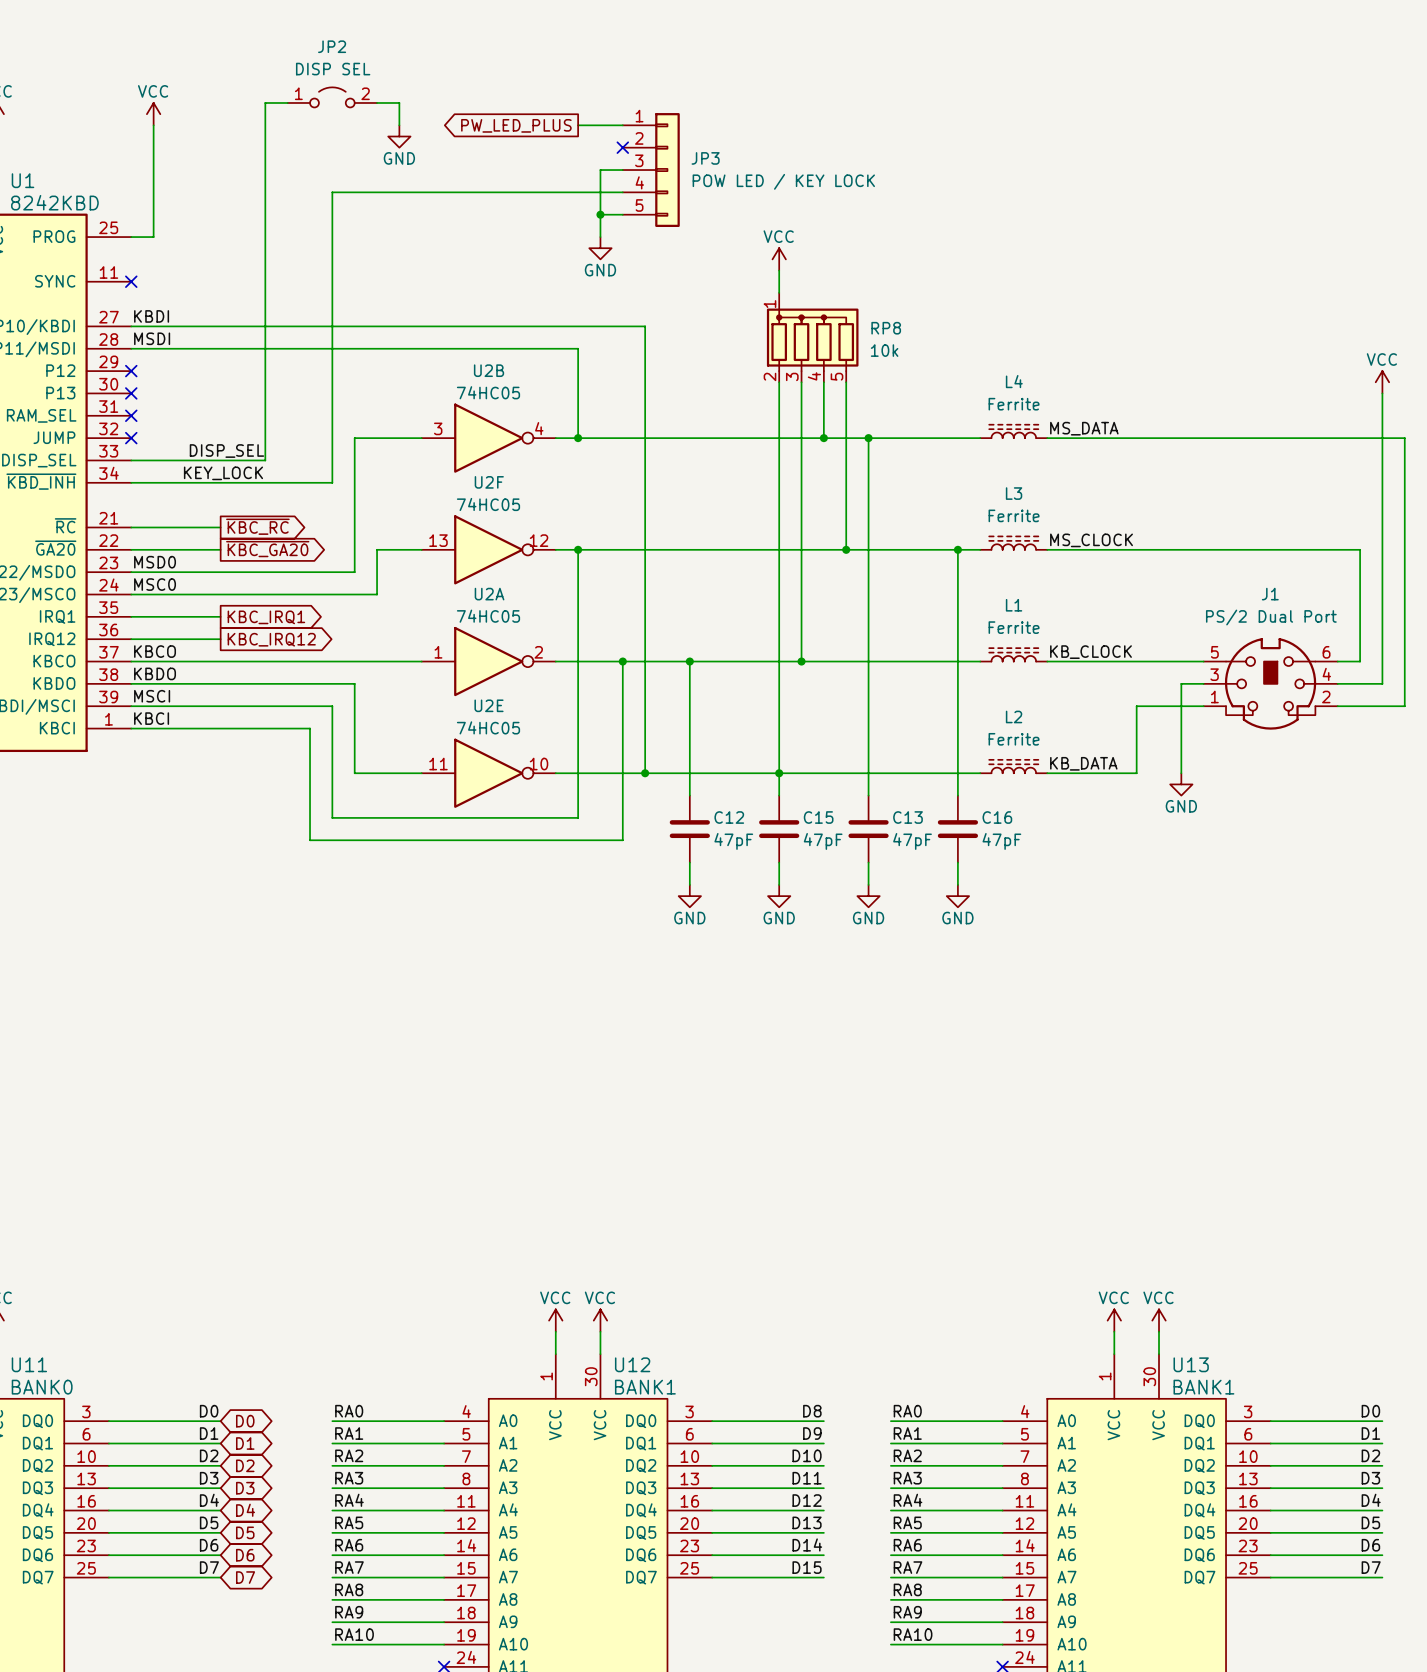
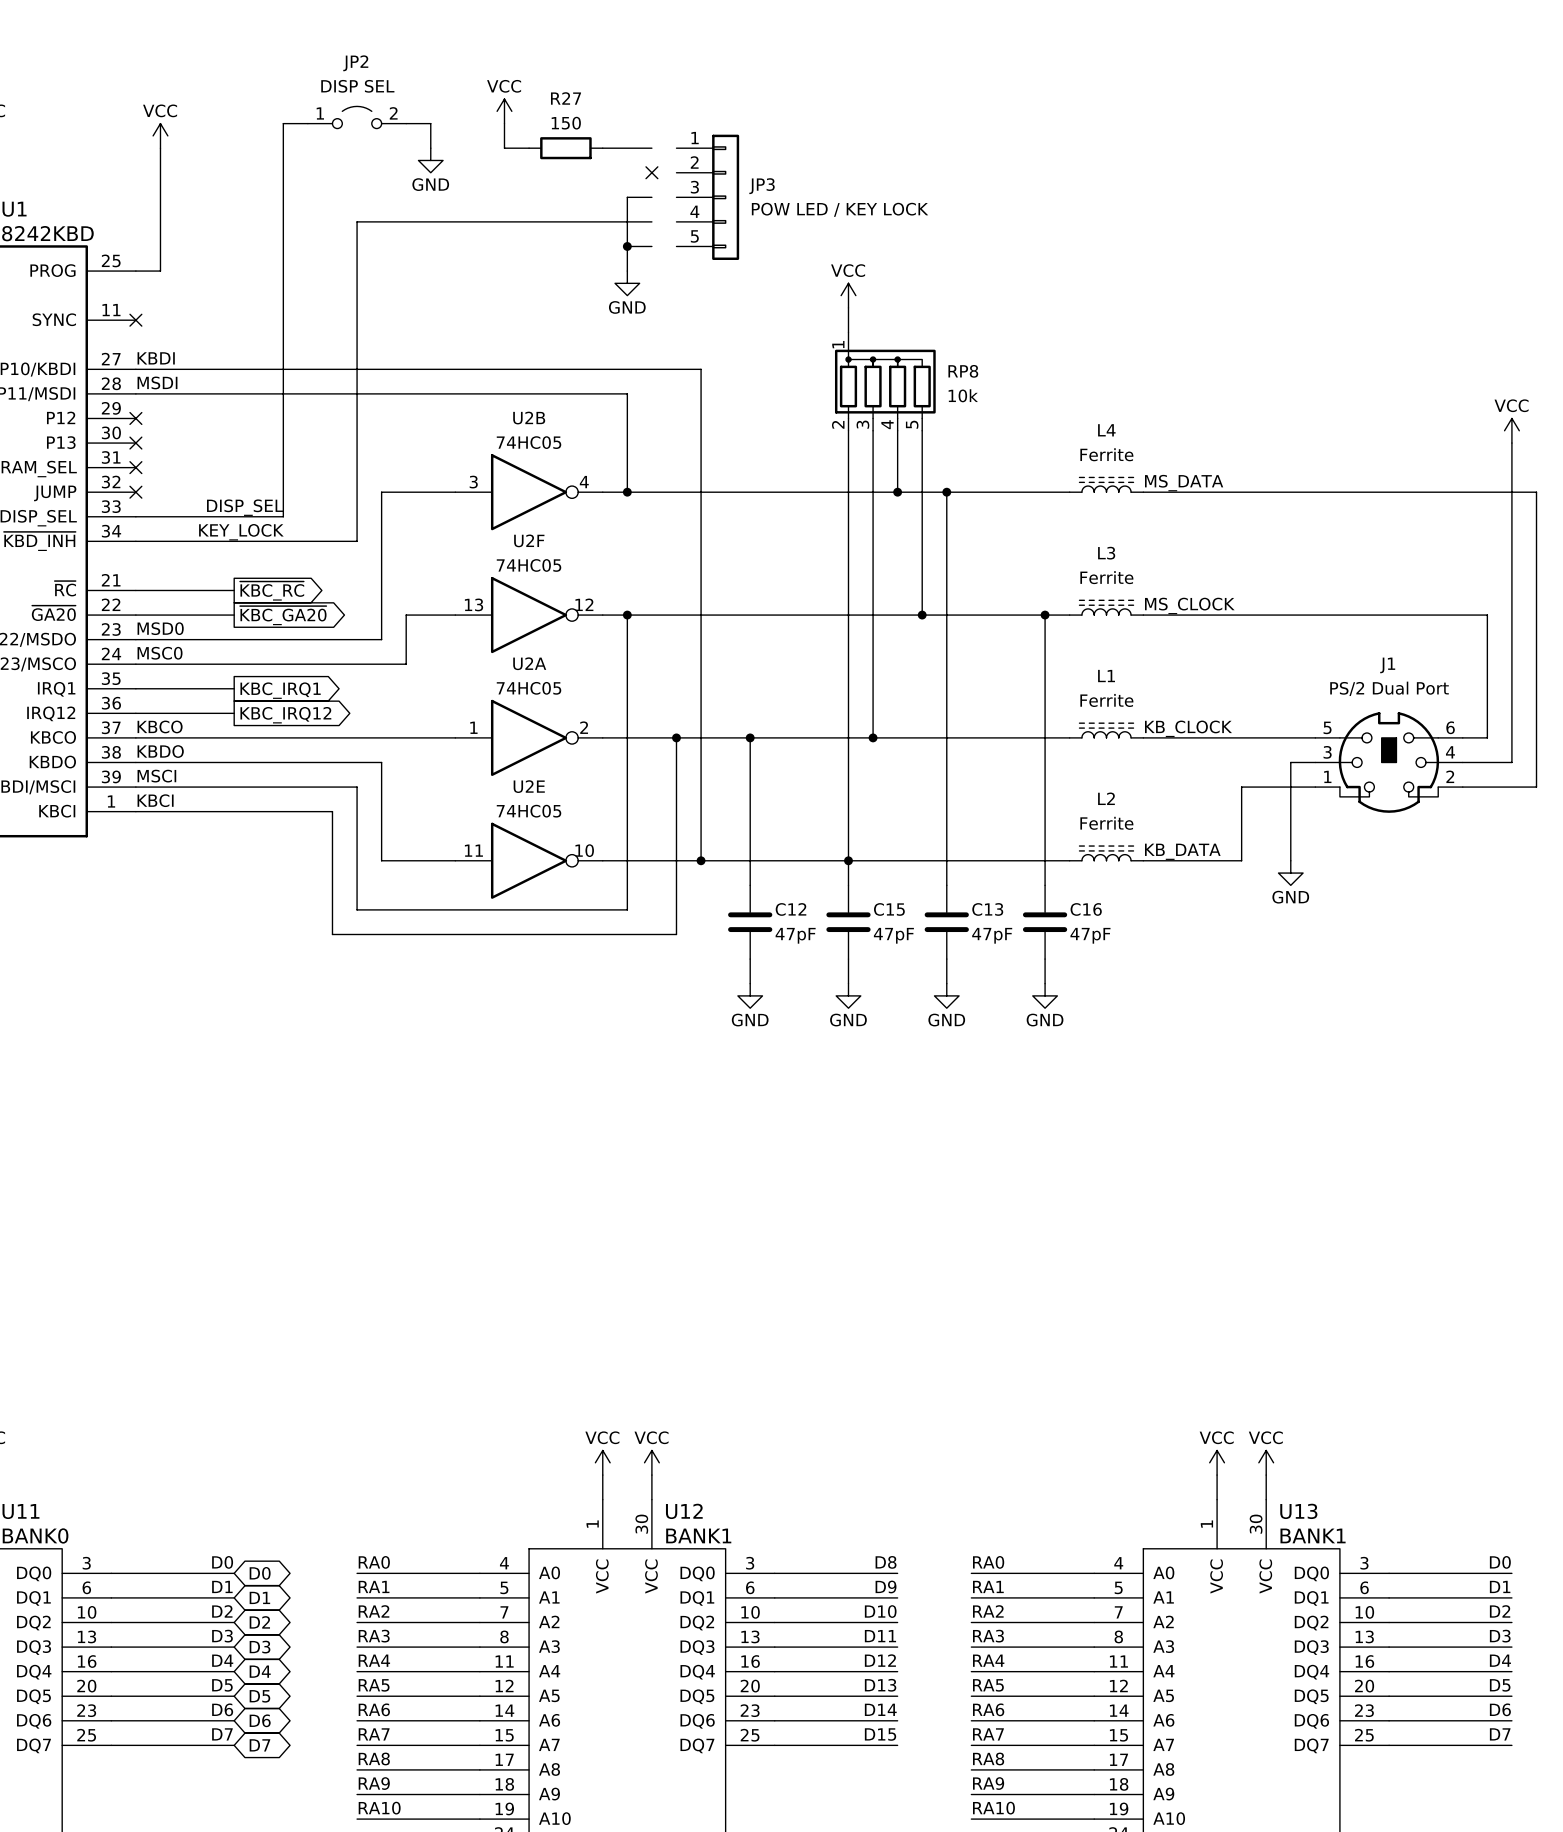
power symbol: none -> VCC (504, 111)
wire: none -> (504, 123) (504, 148) (529, 148)
global label: PW_LED_PLUS (516, 125) -> none
R27: none -> 150 (565, 148)
wire: (600, 125) (622, 125) -> (602, 148) (627, 148)
no-connect mark position: (622, 147) -> (651, 172)
wire: (622, 170) (600, 170) (600, 237) -> (651, 197) (627, 197) (627, 271)
wire: (600, 192) (622, 192) -> none
wire: (600, 214) (622, 214) -> (651, 246) (627, 246)
junction position: (600, 214) -> (627, 246)
power symbol position: GND (600, 248) -> GND (627, 283)

